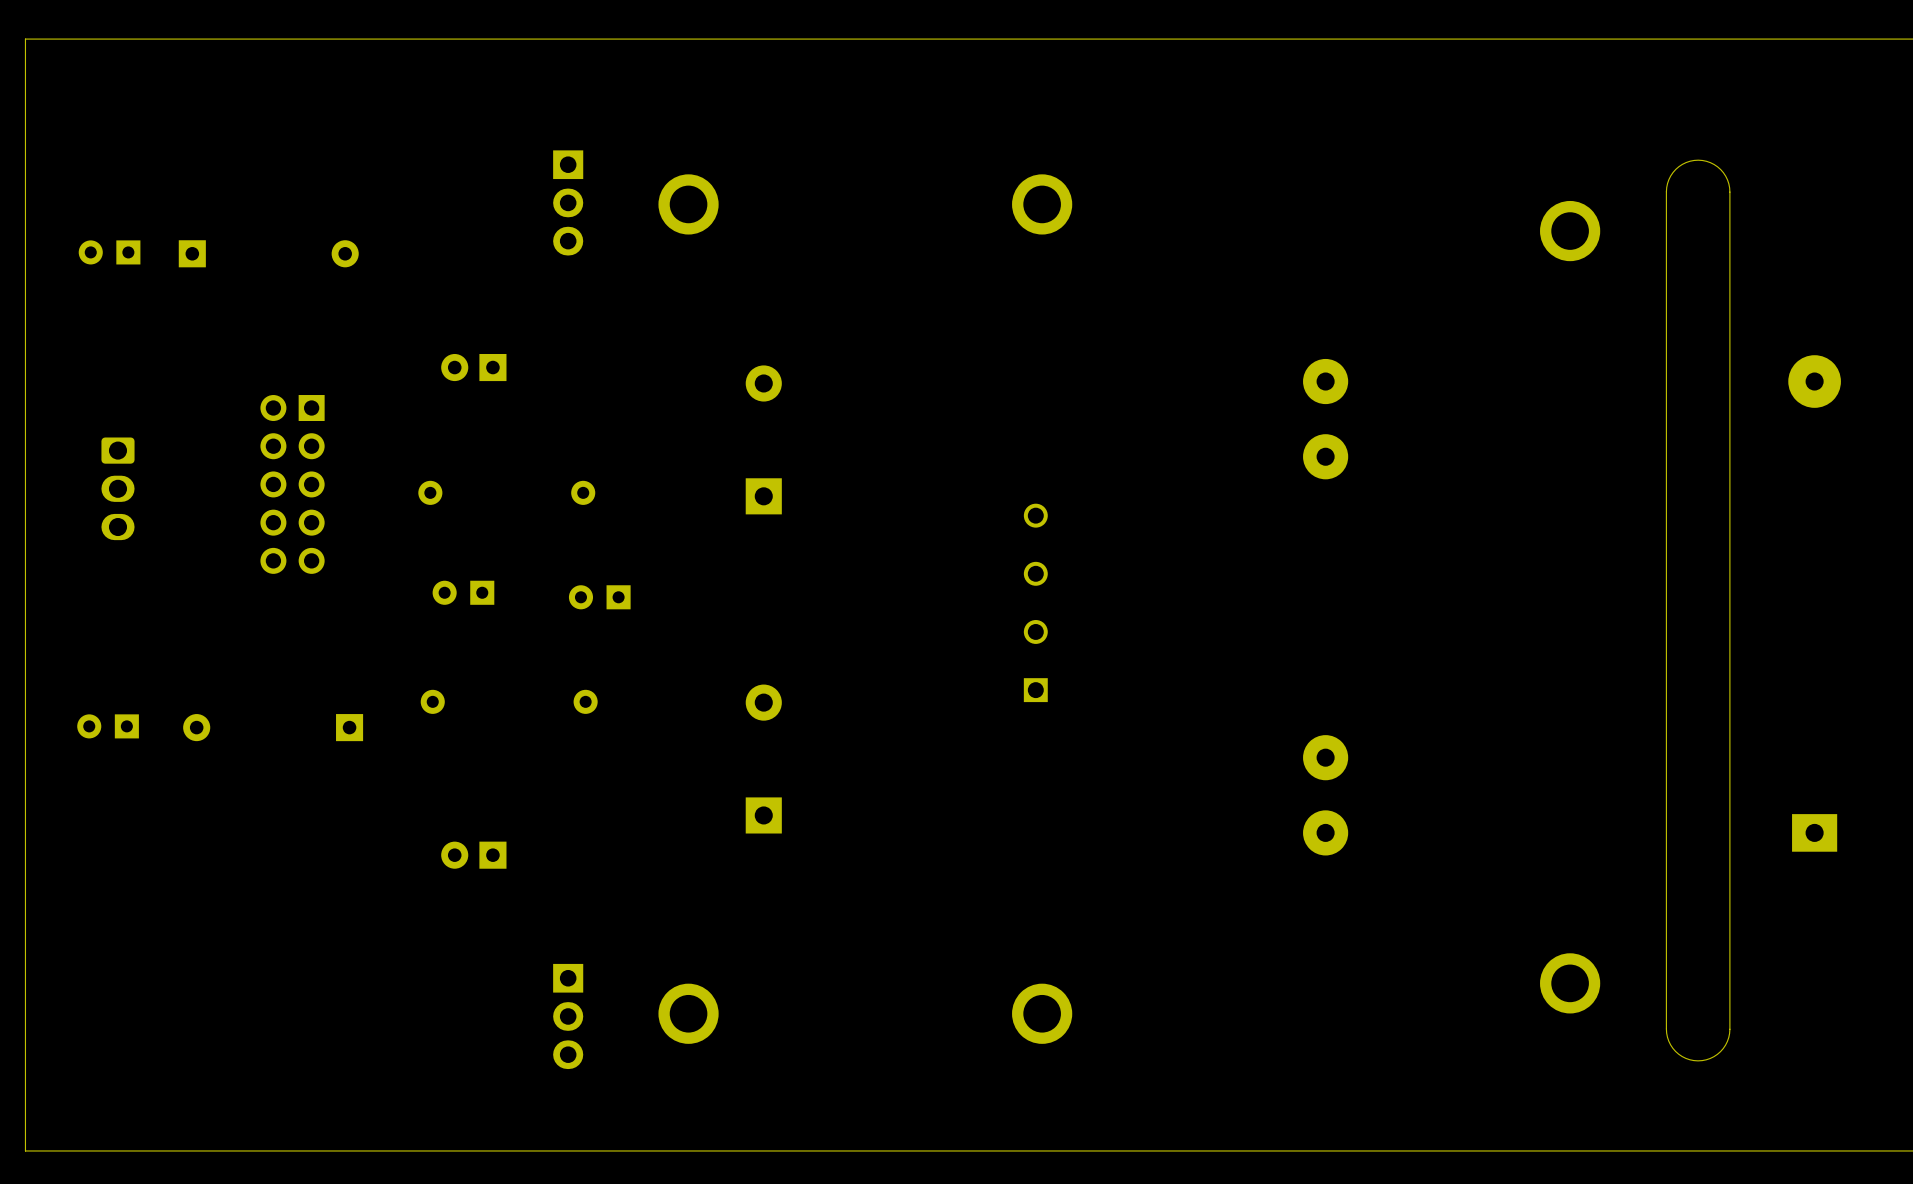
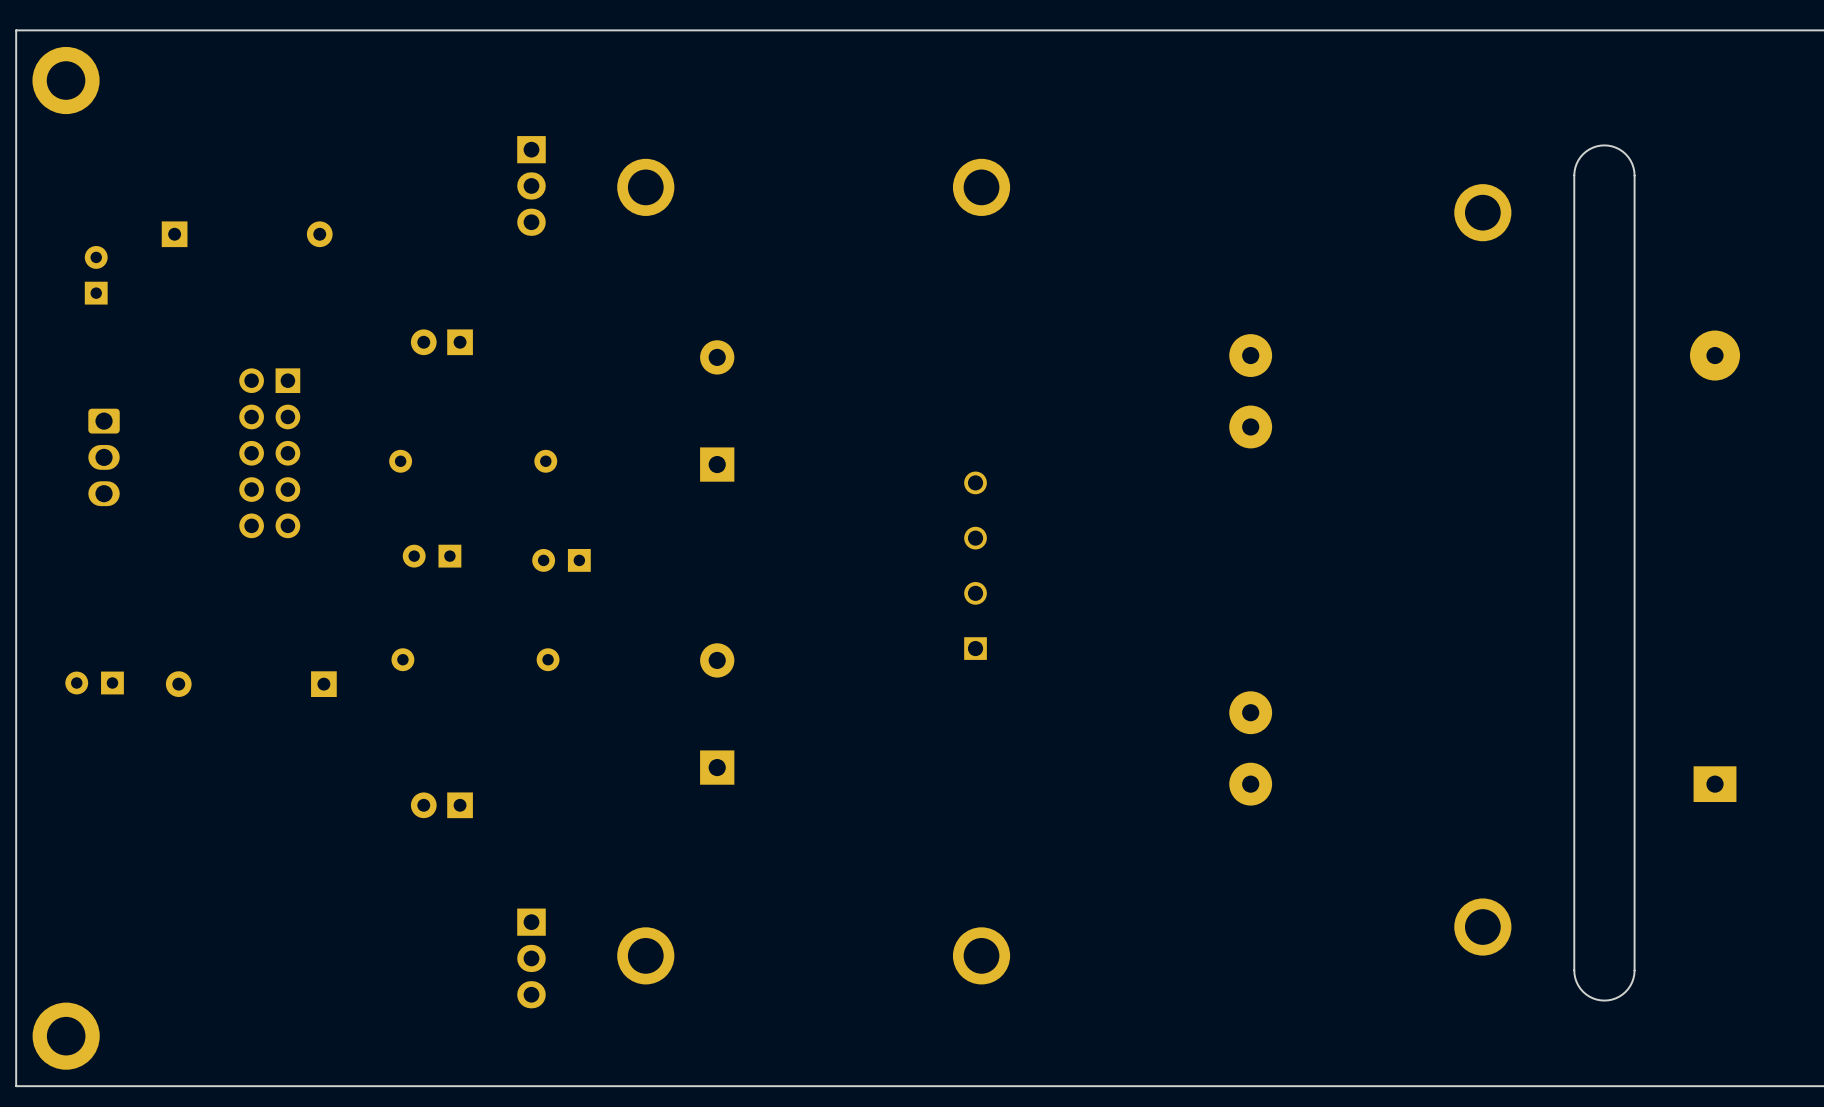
part: none -> (66, 80)
part rotation: 0° (109, 252) -> 90° clockwise (96, 275)
part position: (109, 252) -> (96, 275)
part: none -> (66, 1036)

